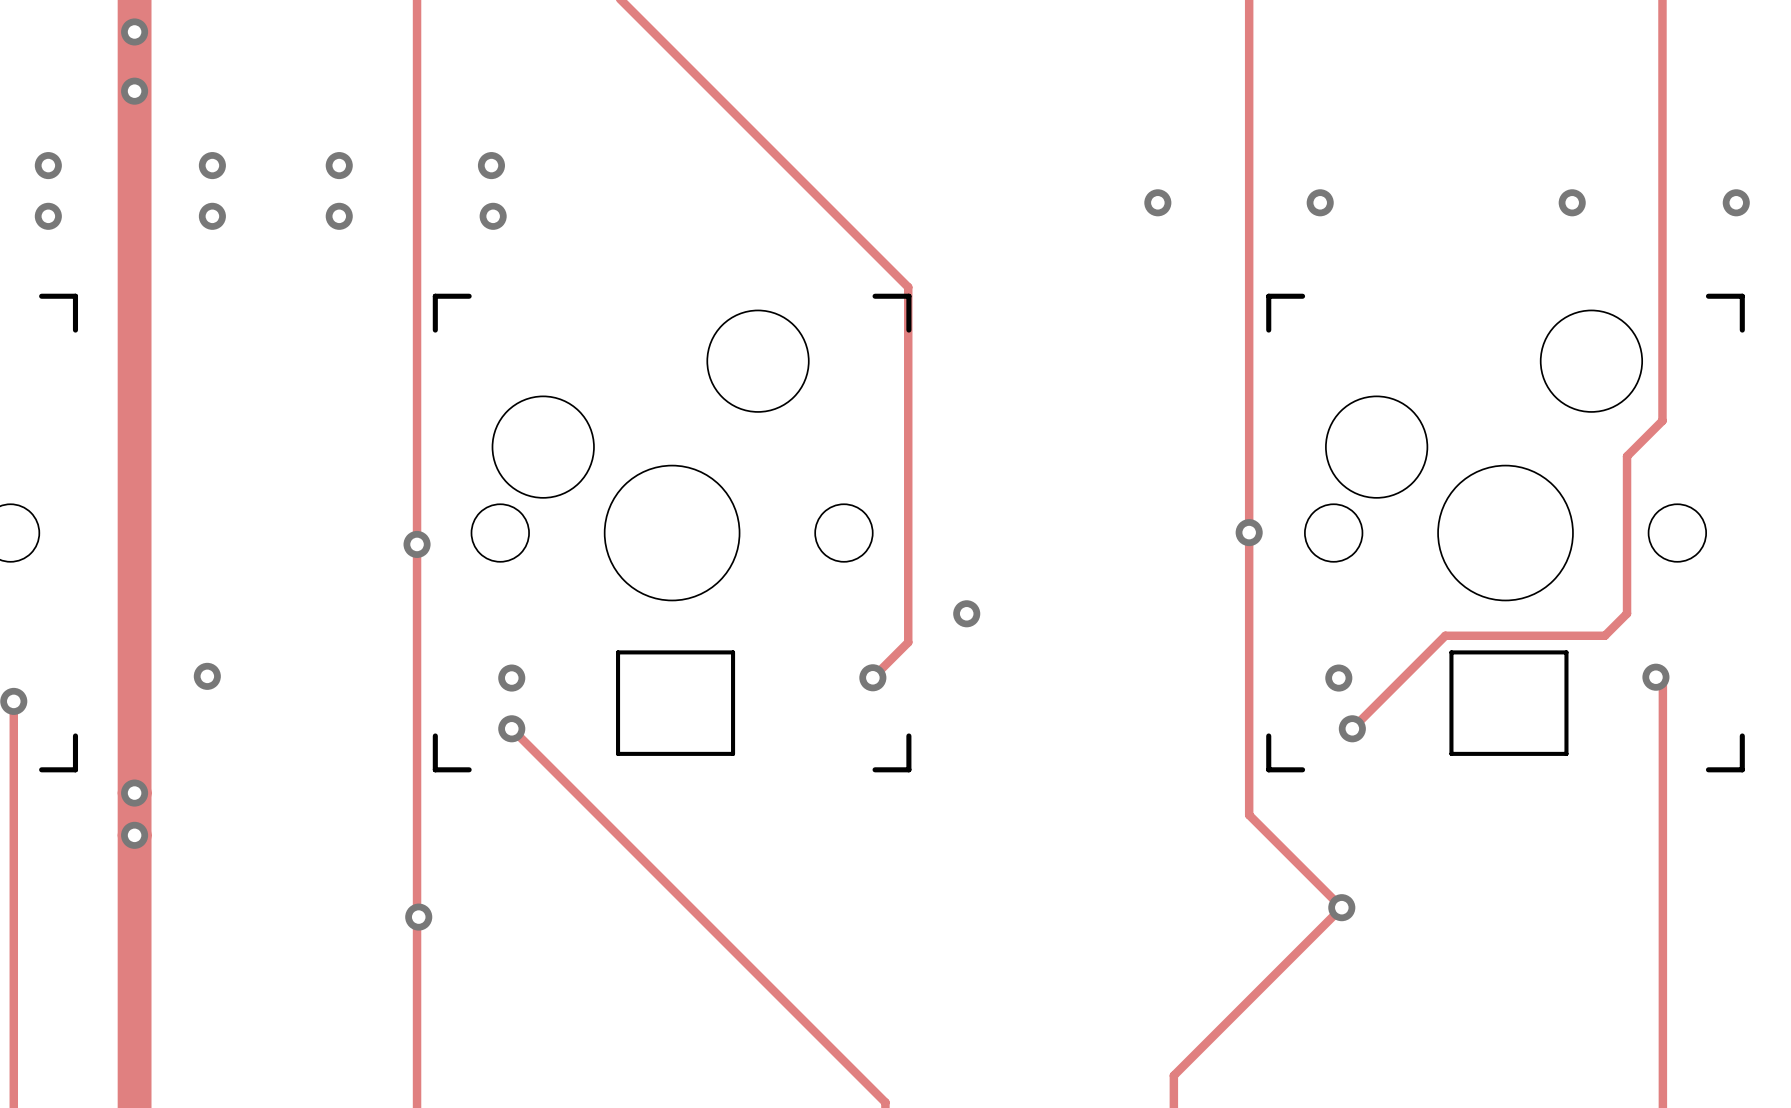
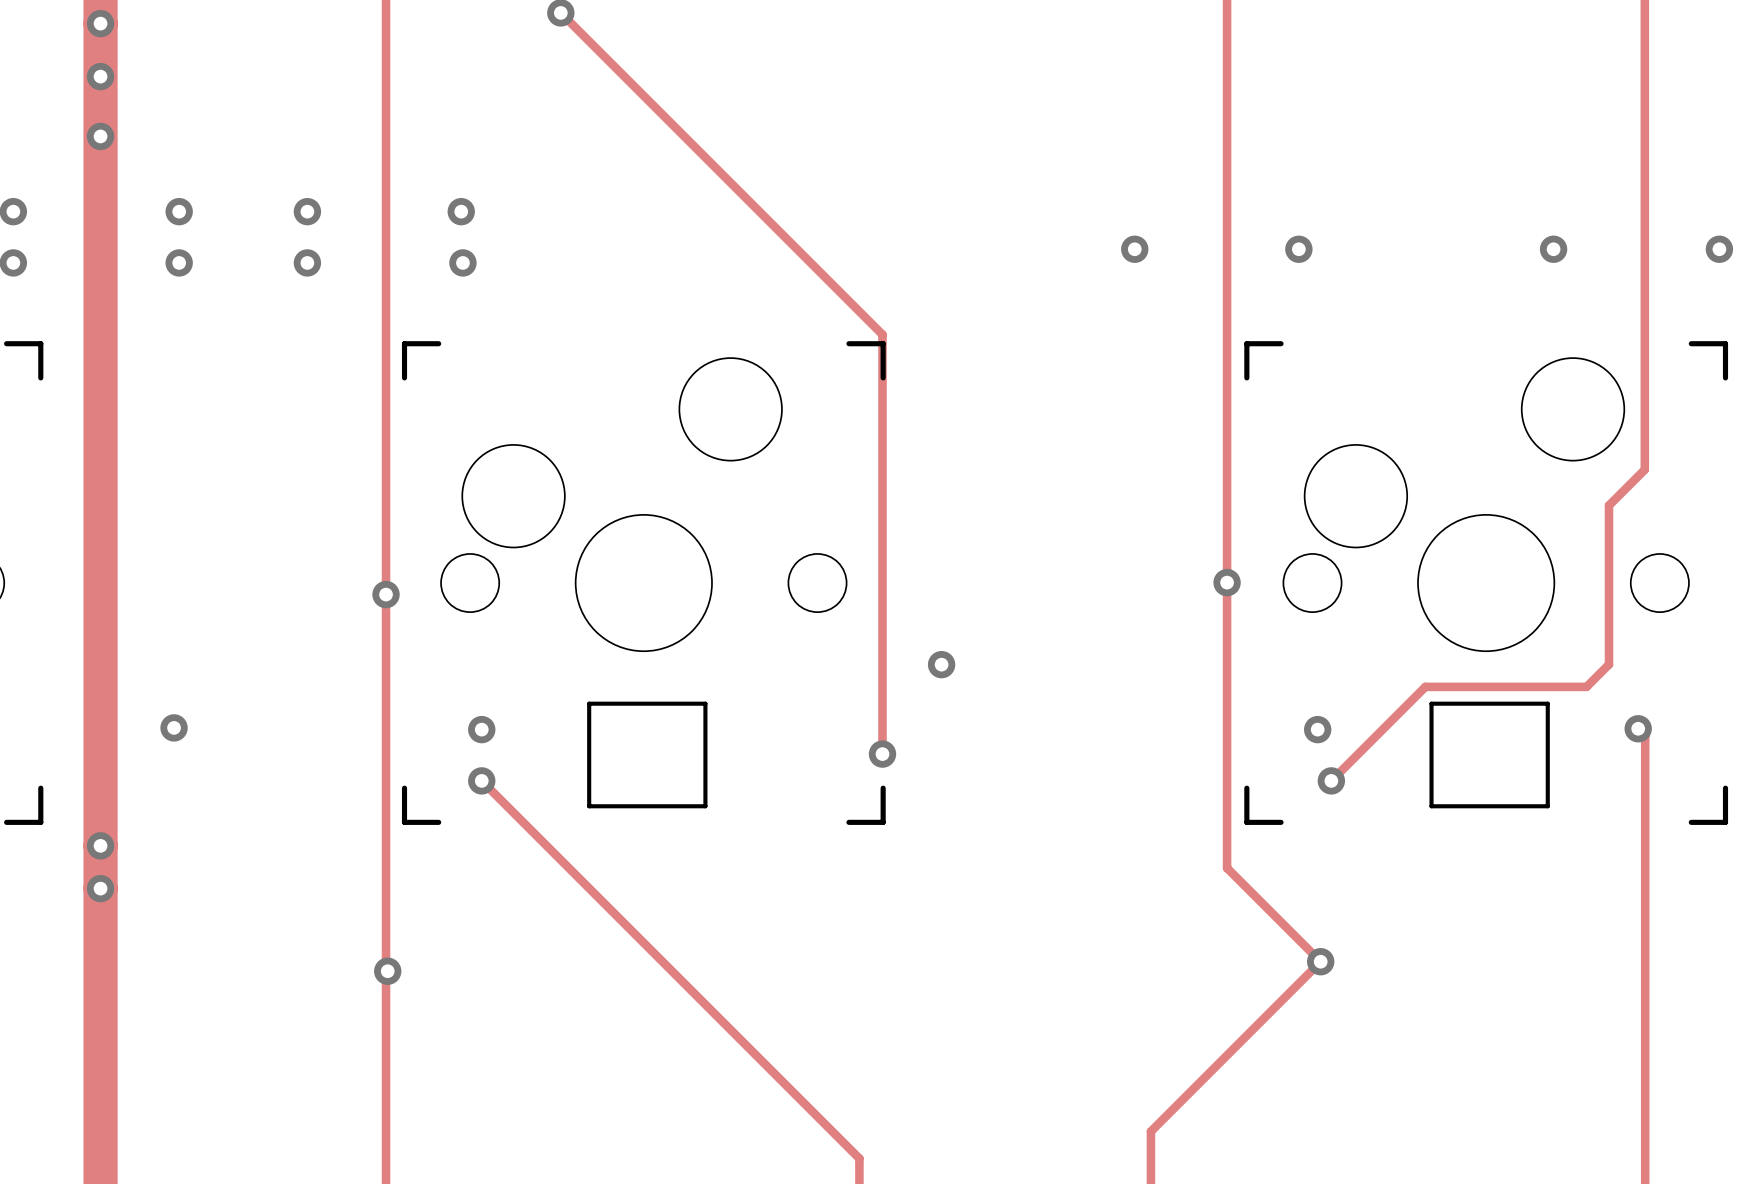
track: (908, 642) (872, 677) -> (882, 693) (882, 754)
via position: (872, 677) -> (882, 754)

